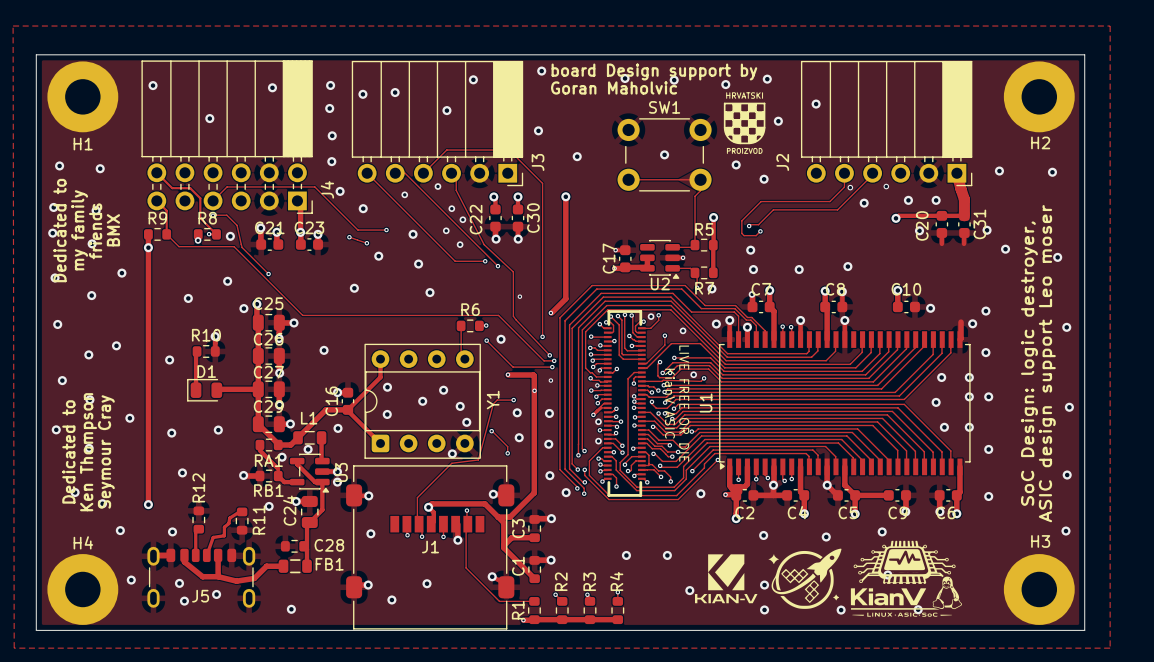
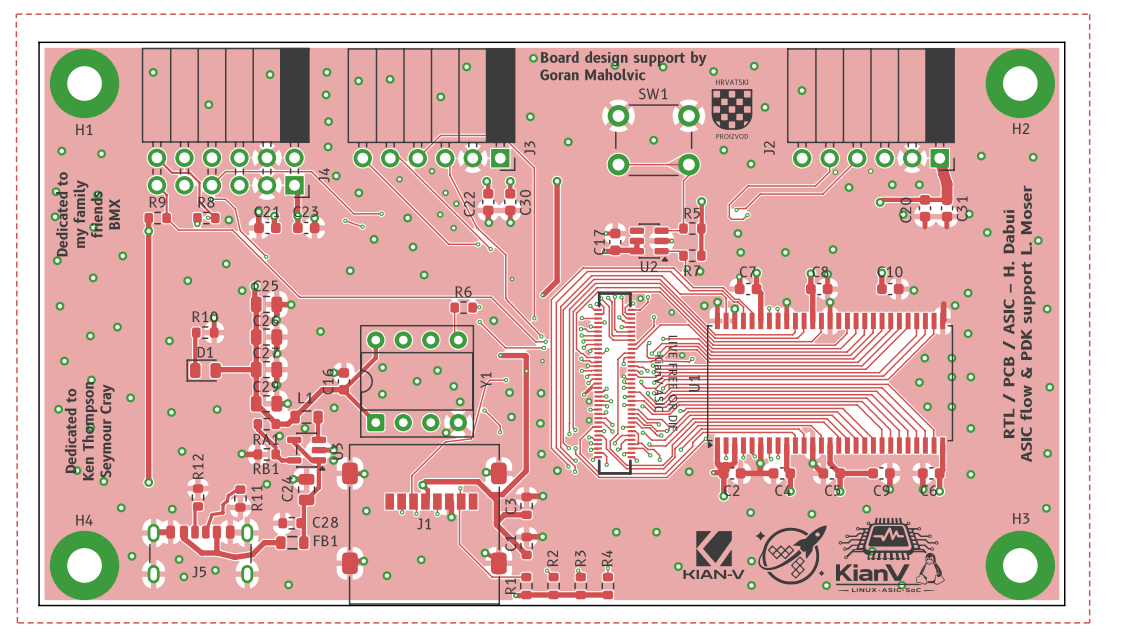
text: board Design support by (654, 72) -> Board design support by (623, 58)
text: none -> RTL / PCB / ASIC – H. Dabui (1008, 324)
text: SoC Design: logic destroyer, (1029, 363) -> none
text: ASIC design support Leo moser (1047, 363) -> ASIC flow & PDK support L. Moser (1027, 323)

